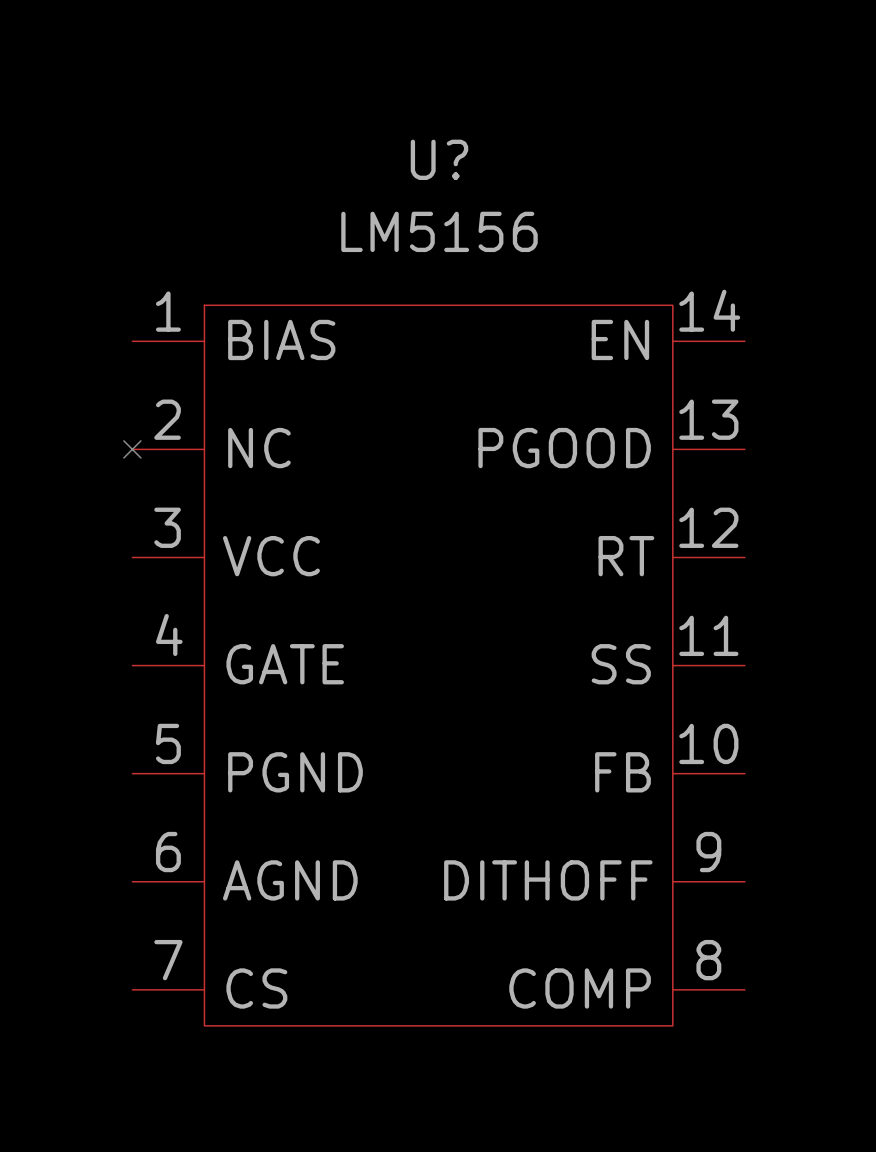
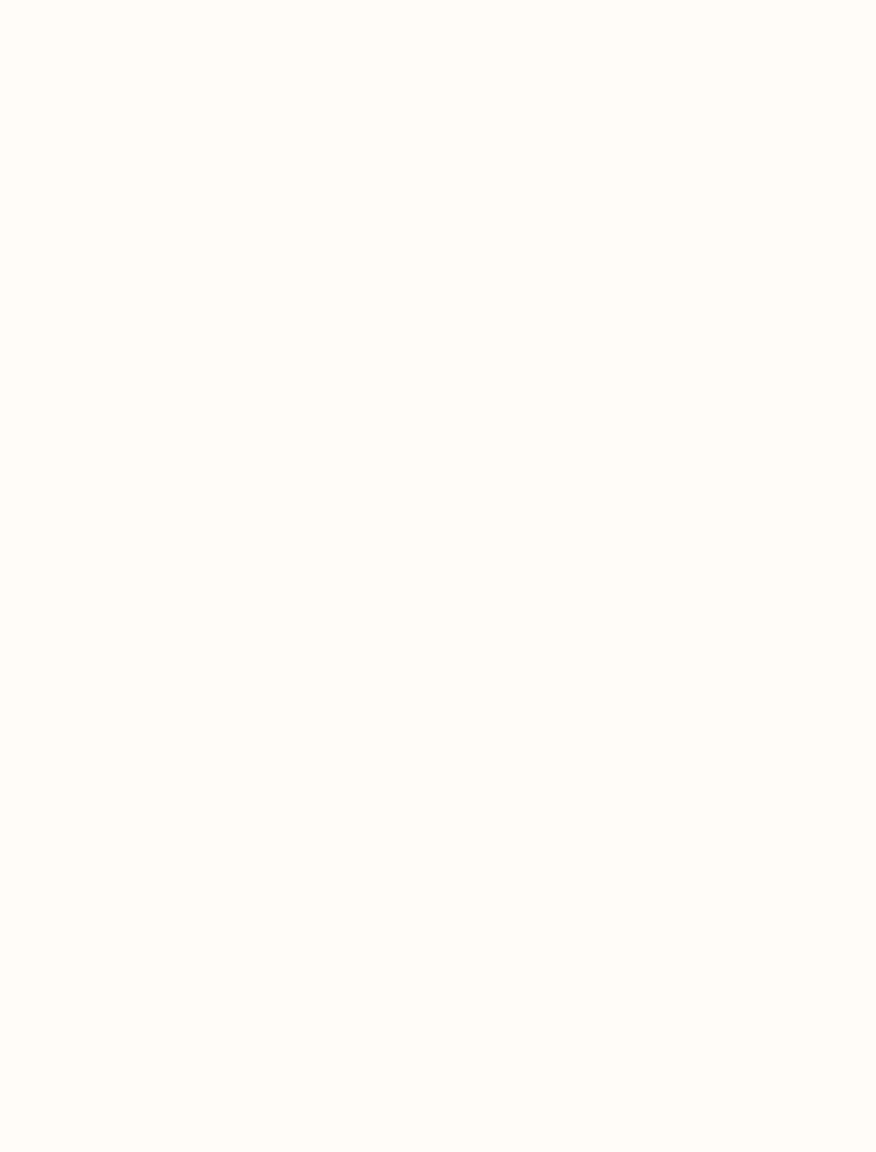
U?: LM5156 (434, 665) -> none

